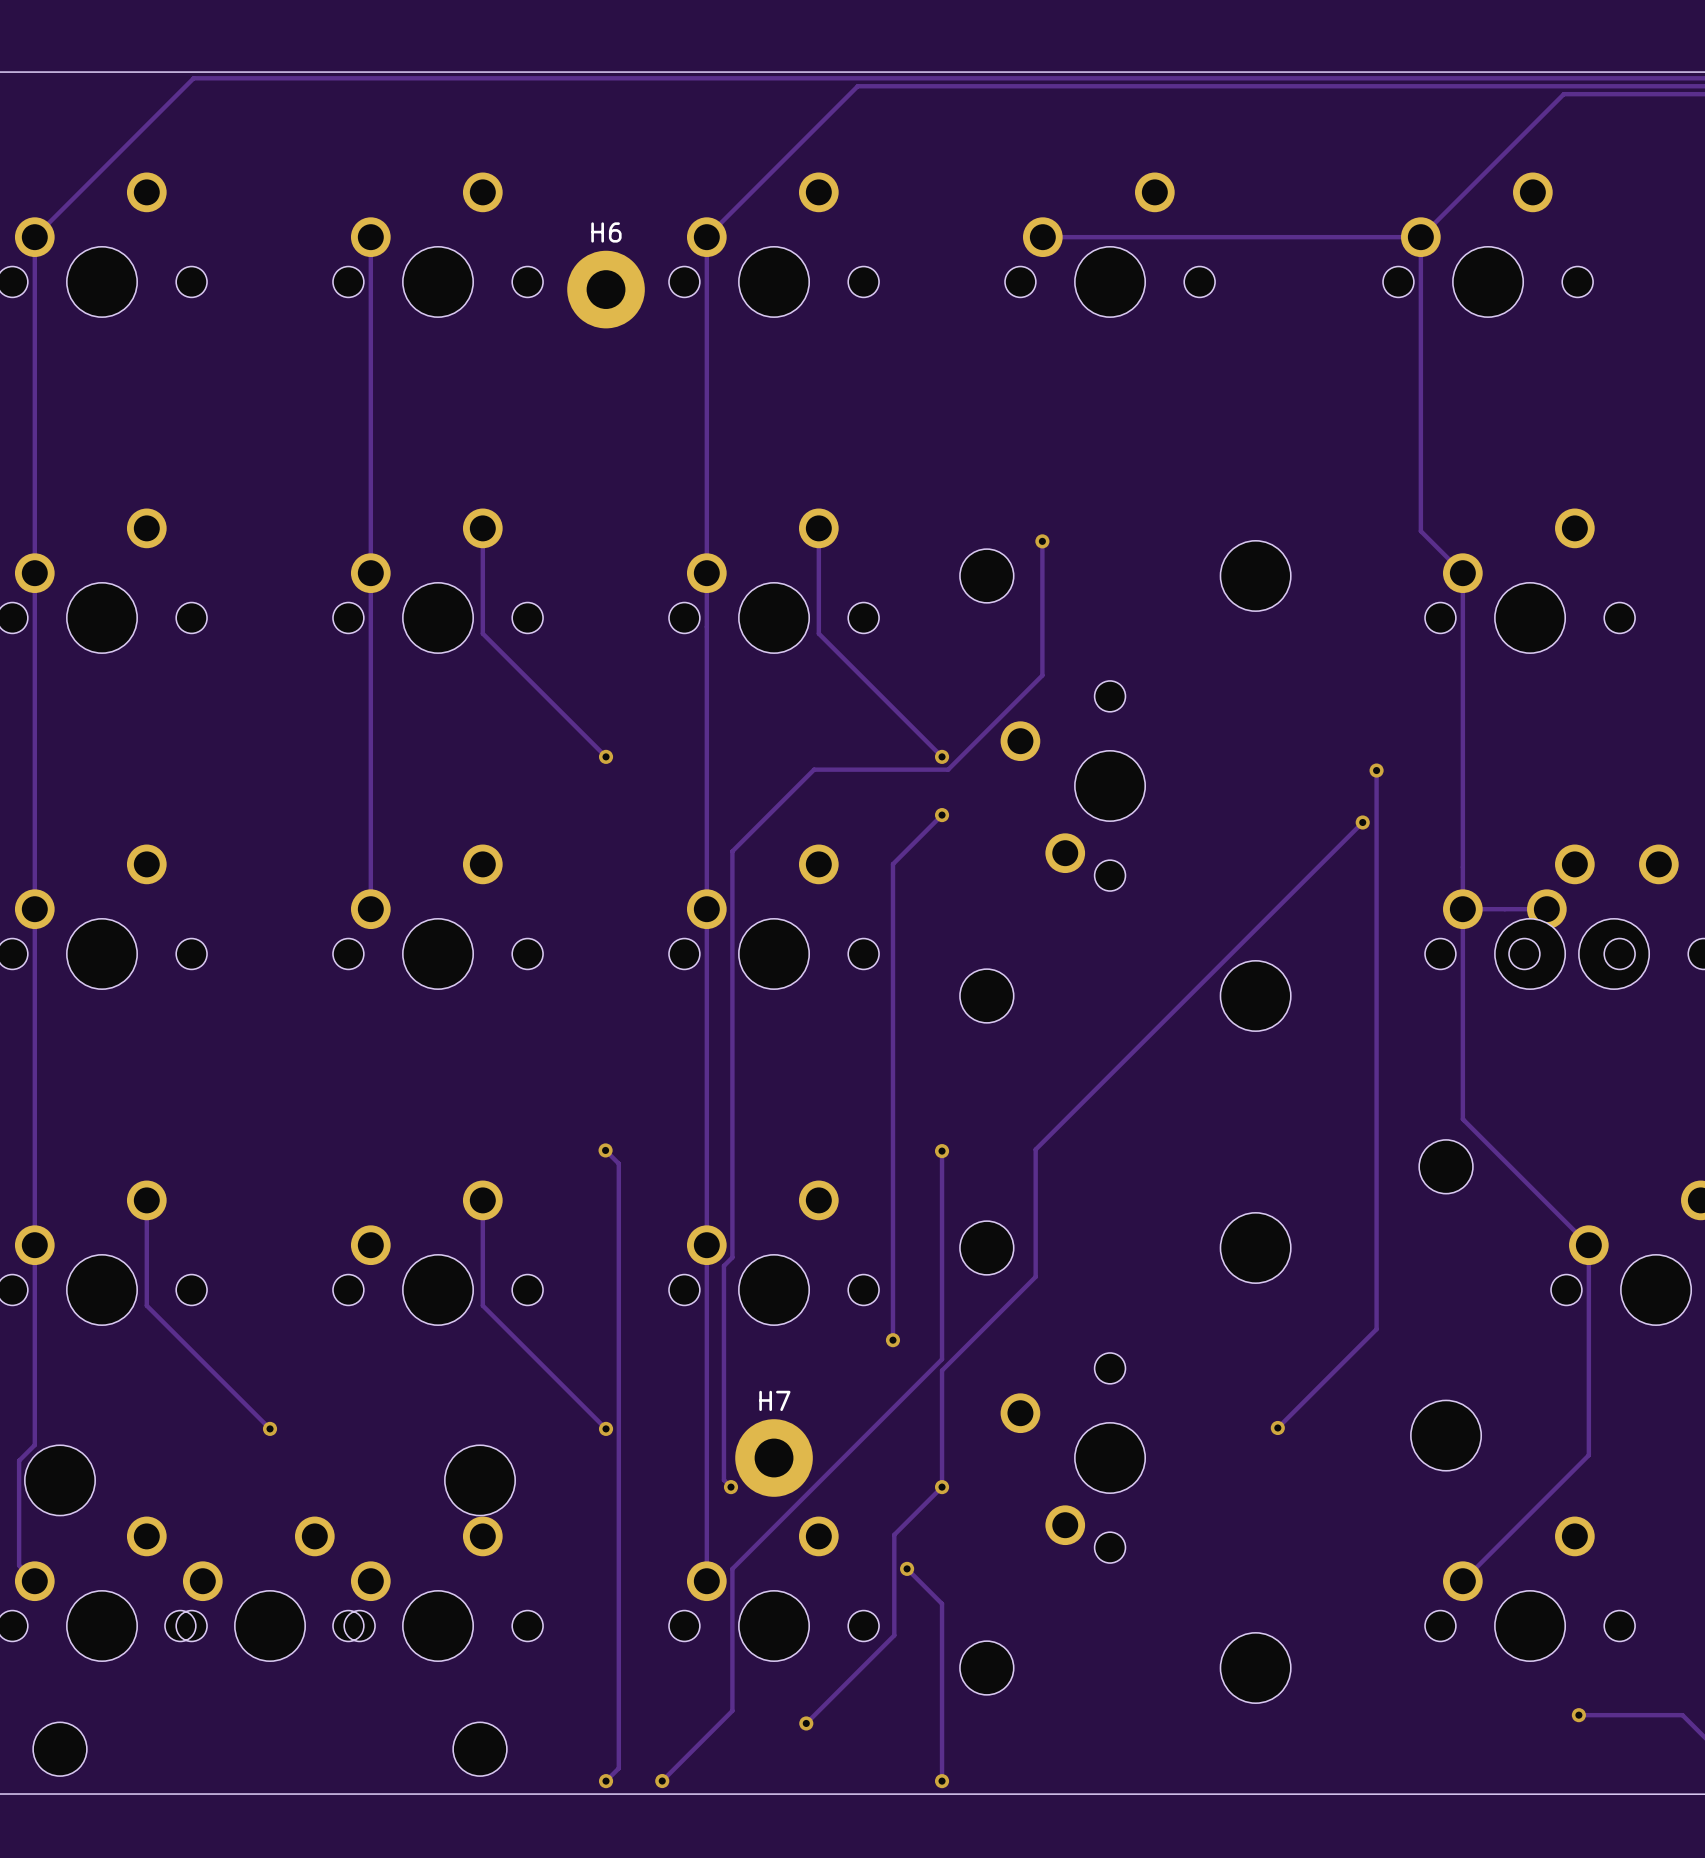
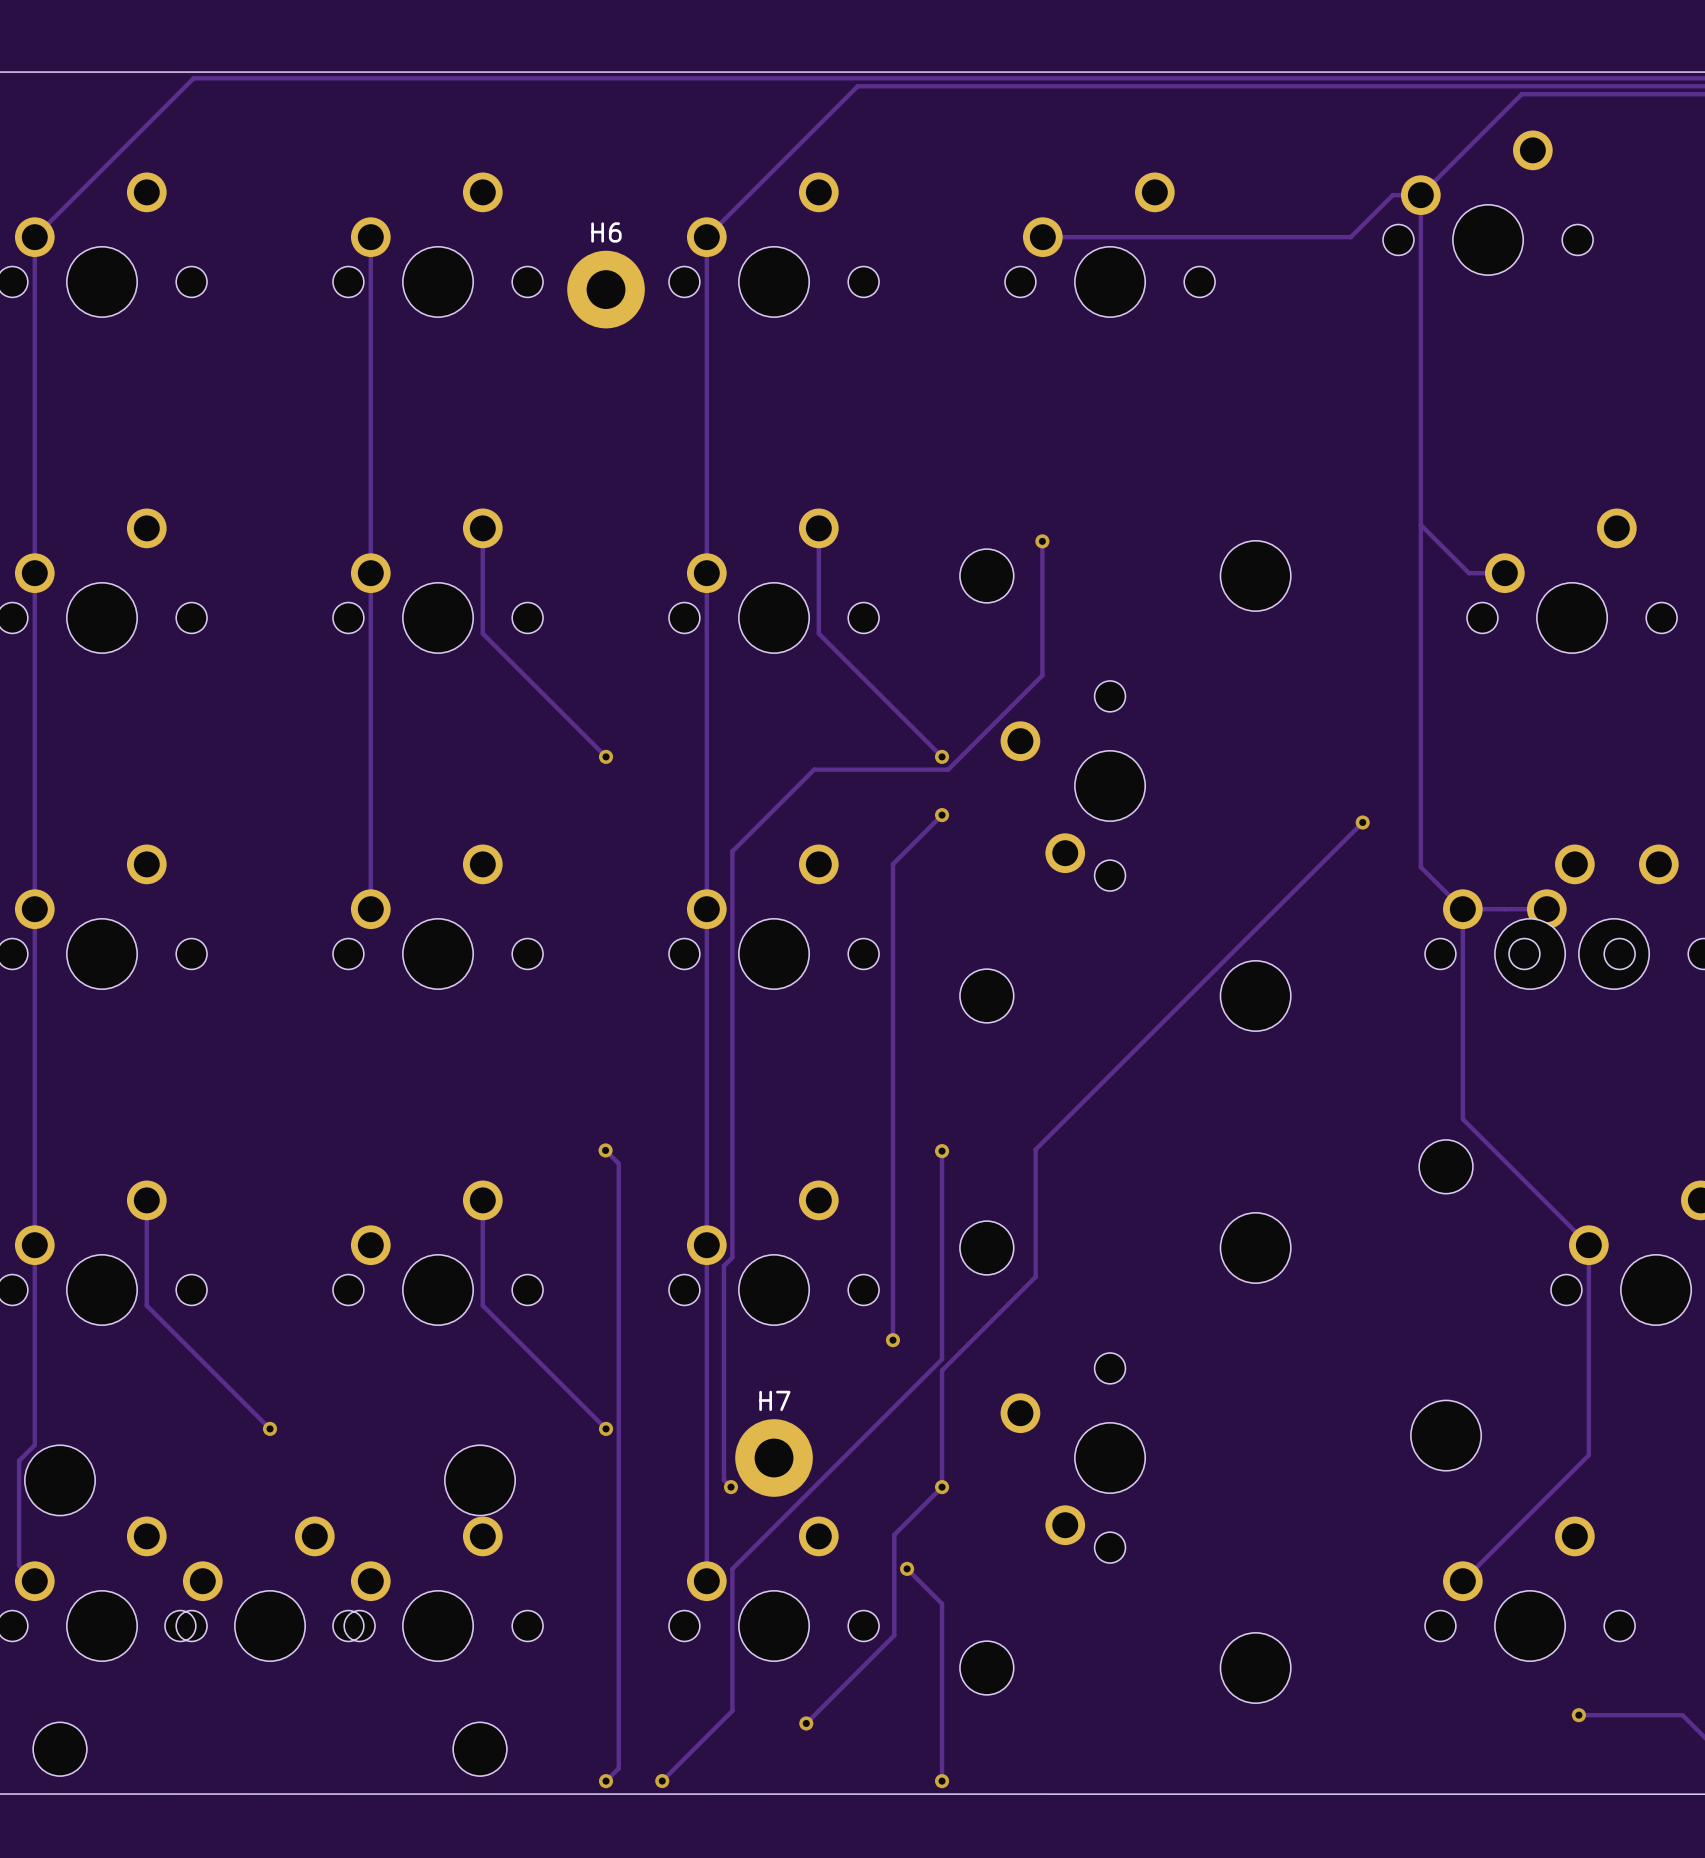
track: (1563, 94) (1420, 237) (1350, 237) -> (1563, 94) (1521, 94) (1420, 195)
track: none -> (1420, 195) (1420, 237)
track: none -> (1420, 195) (1392, 195) (1350, 237)
part position: (1488, 244) -> (1488, 202)
track: none -> (1420, 525) (1468, 573) (1504, 573)
track: (1420, 531) (1462, 573) (1462, 909) -> (1420, 531) (1420, 867) (1462, 909)
part position: (1530, 580) -> (1572, 580)
track: (1376, 770) (1376, 1329) (1277, 1427) -> none
via: (1376, 770) -> none
via: (1277, 1427) -> none

